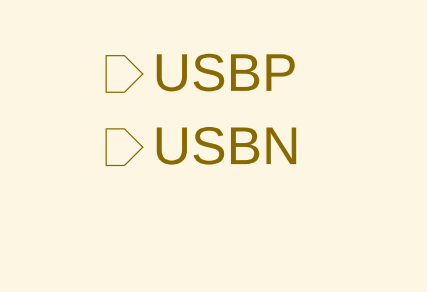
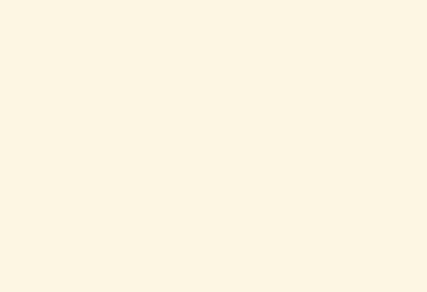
hierarchical label: USBP (225, 72) -> none
hierarchical label: USBN (226, 145) -> none

